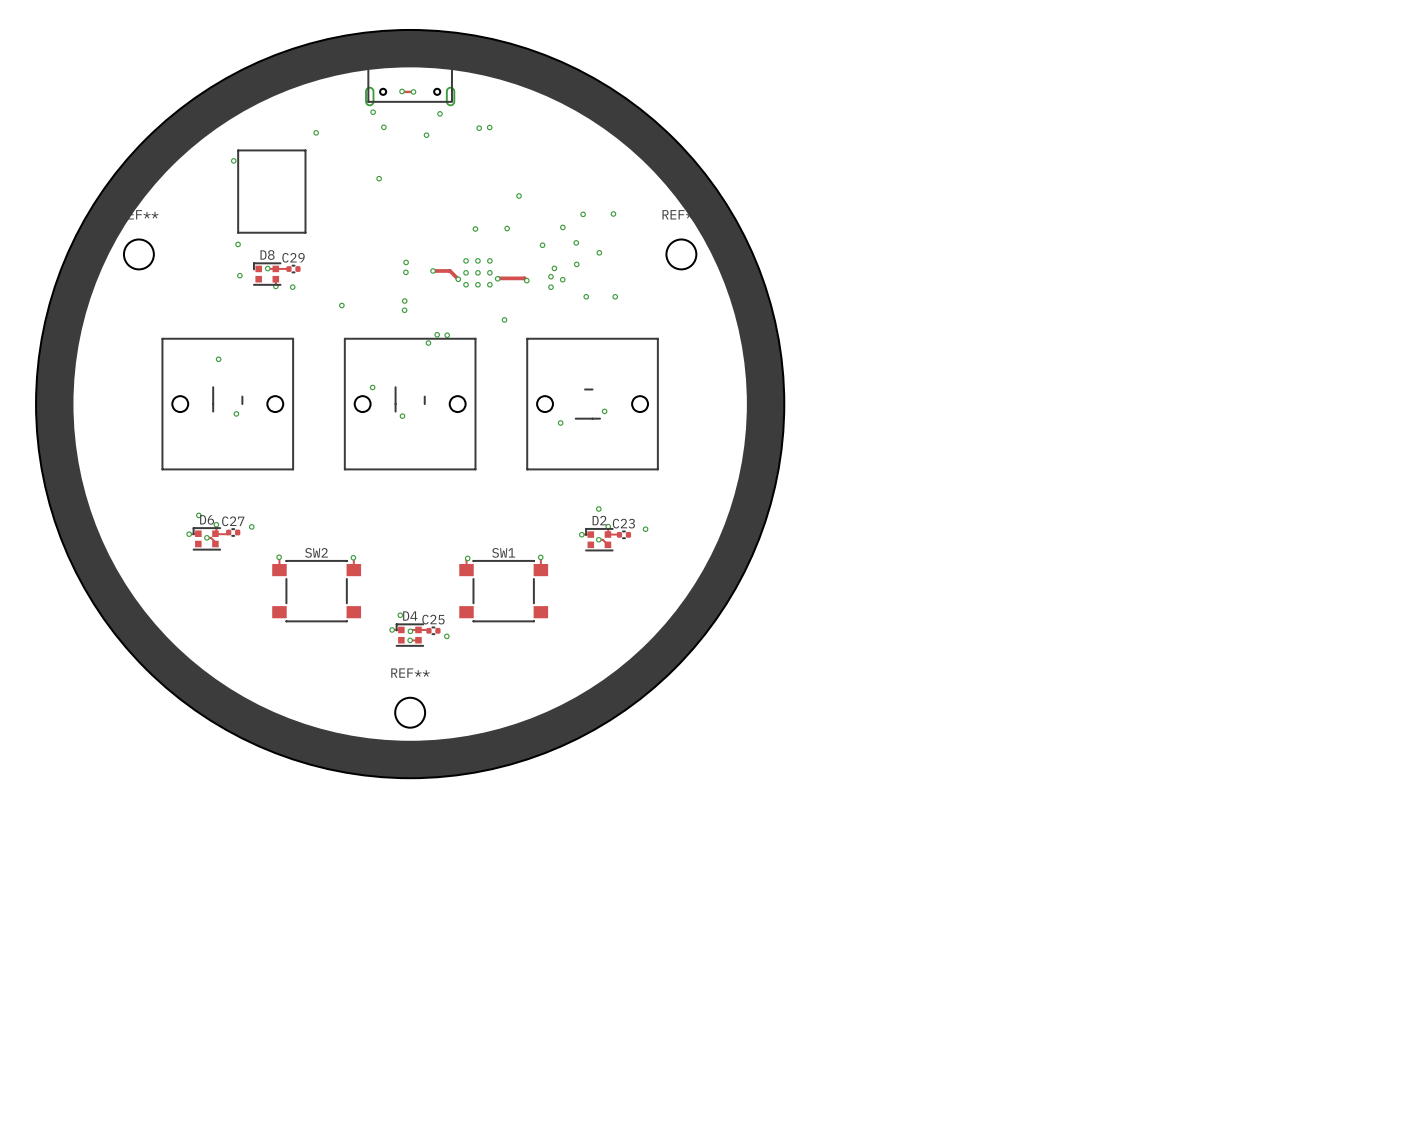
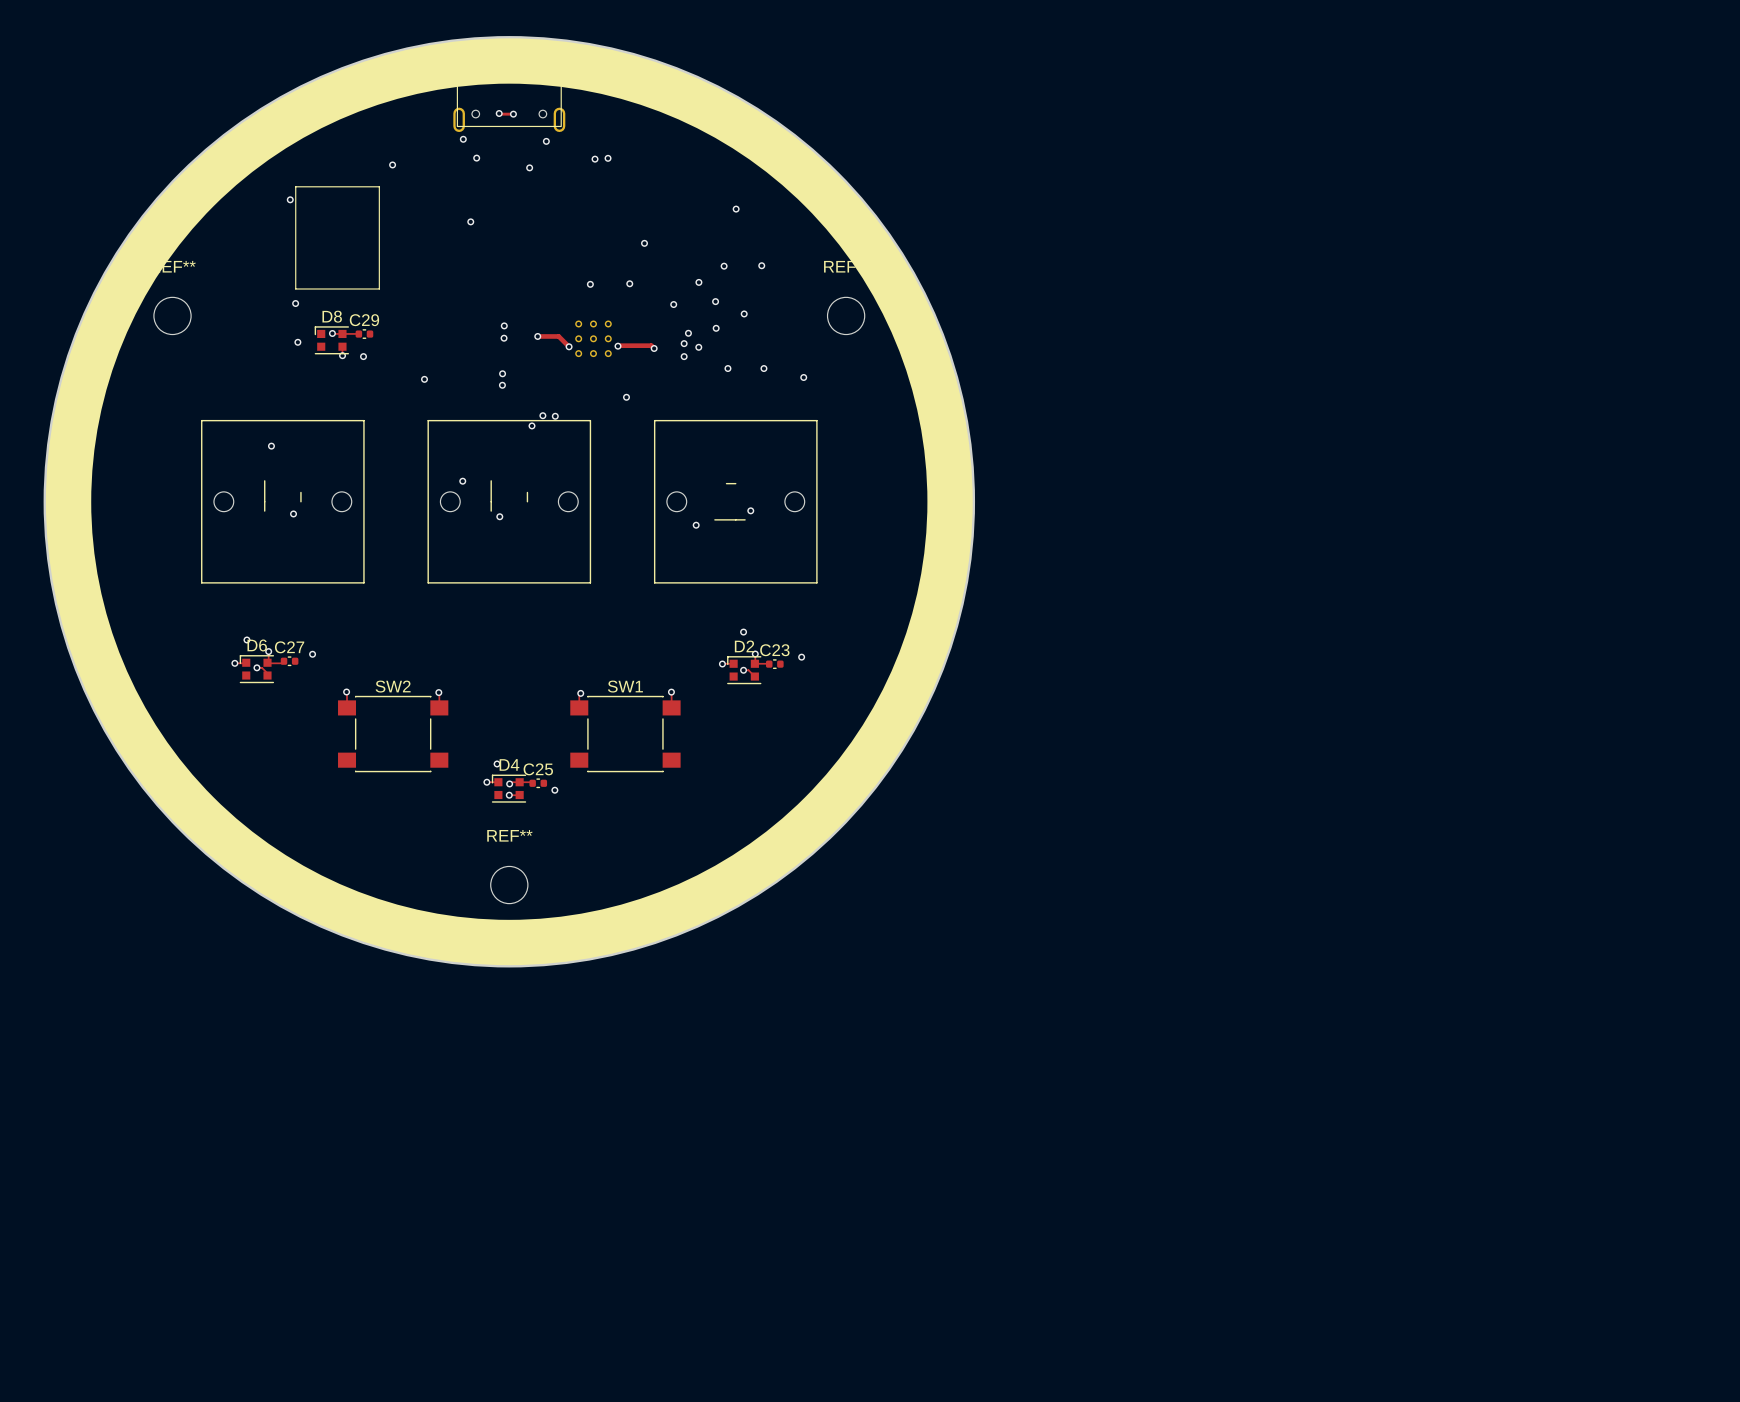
via: none -> (736, 209)
via: none -> (803, 377)

